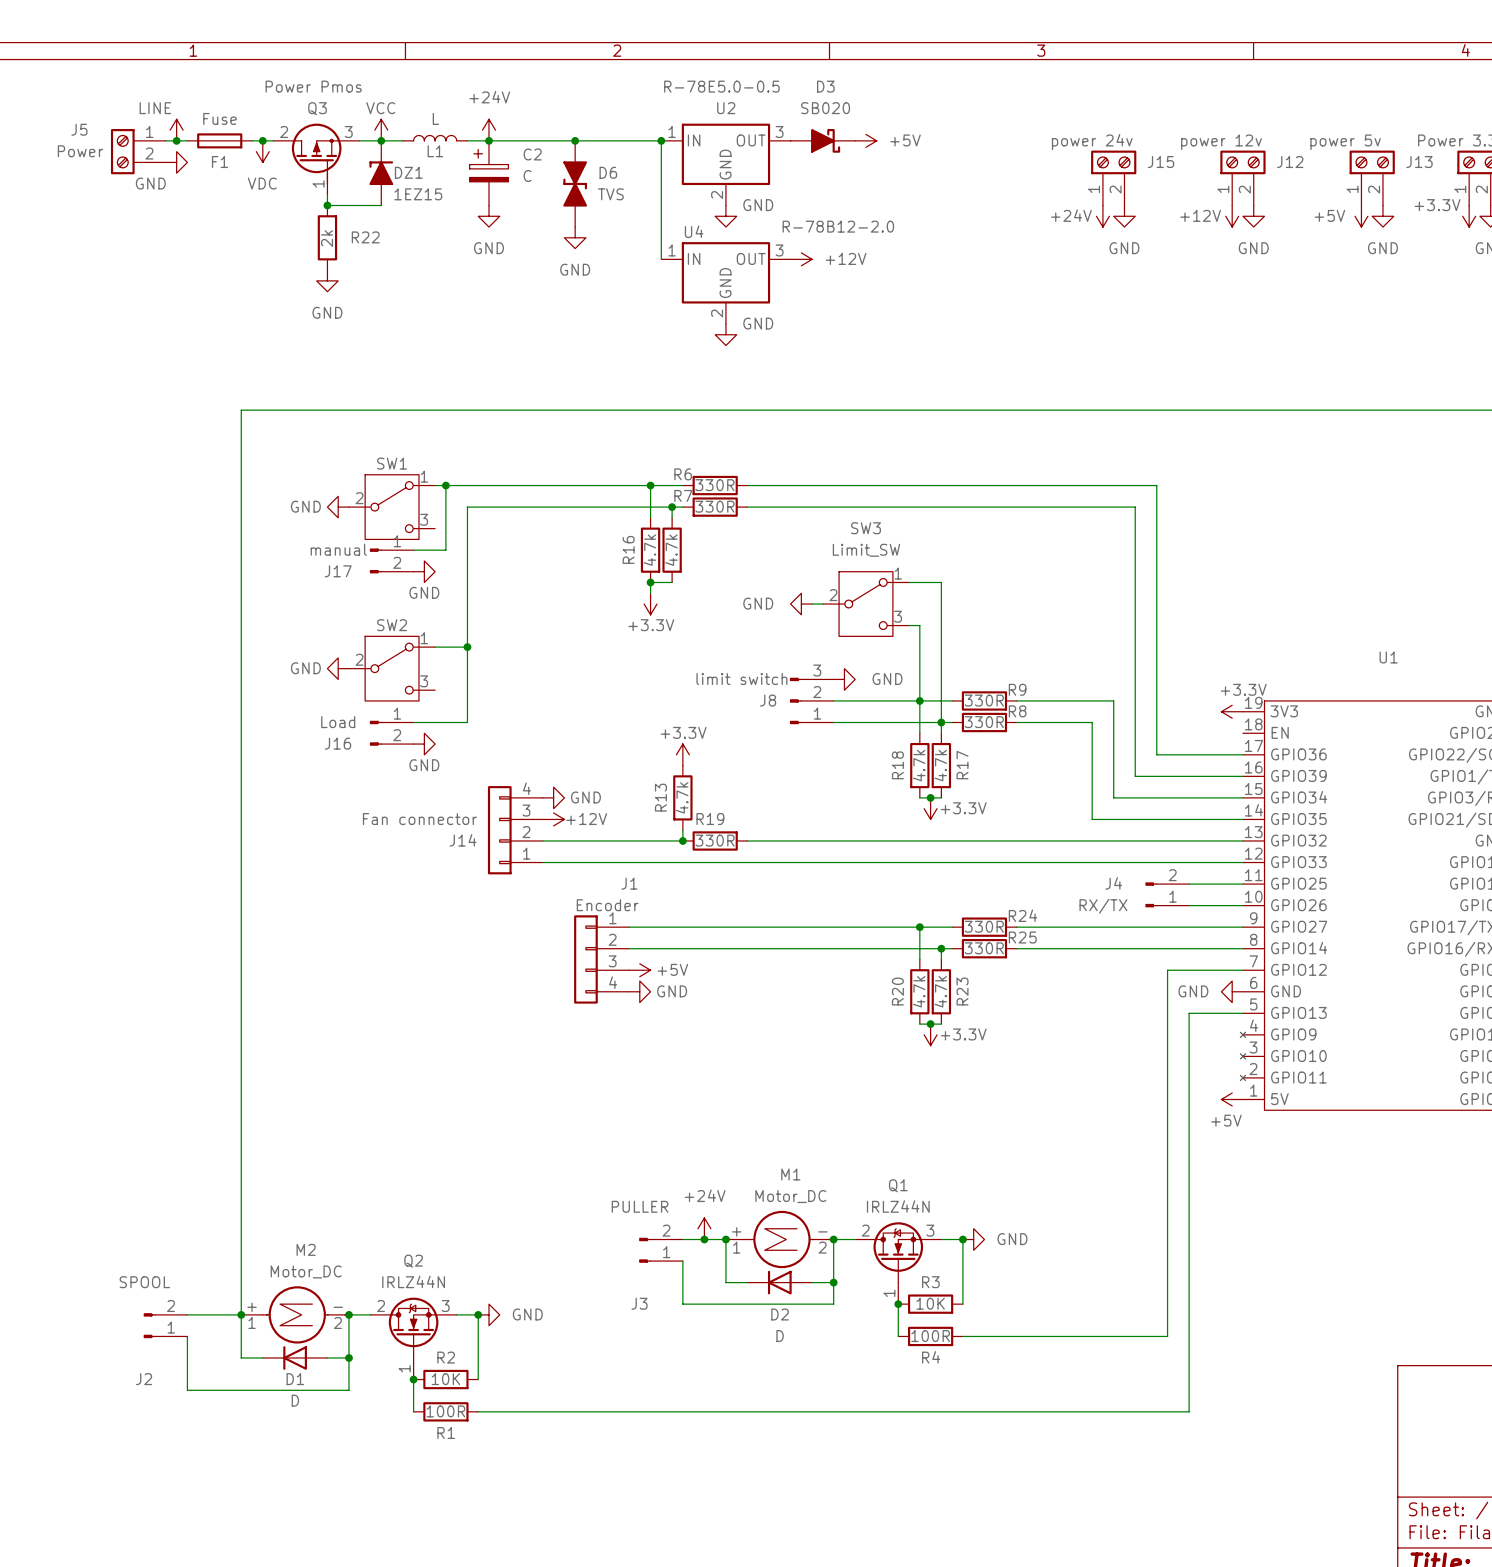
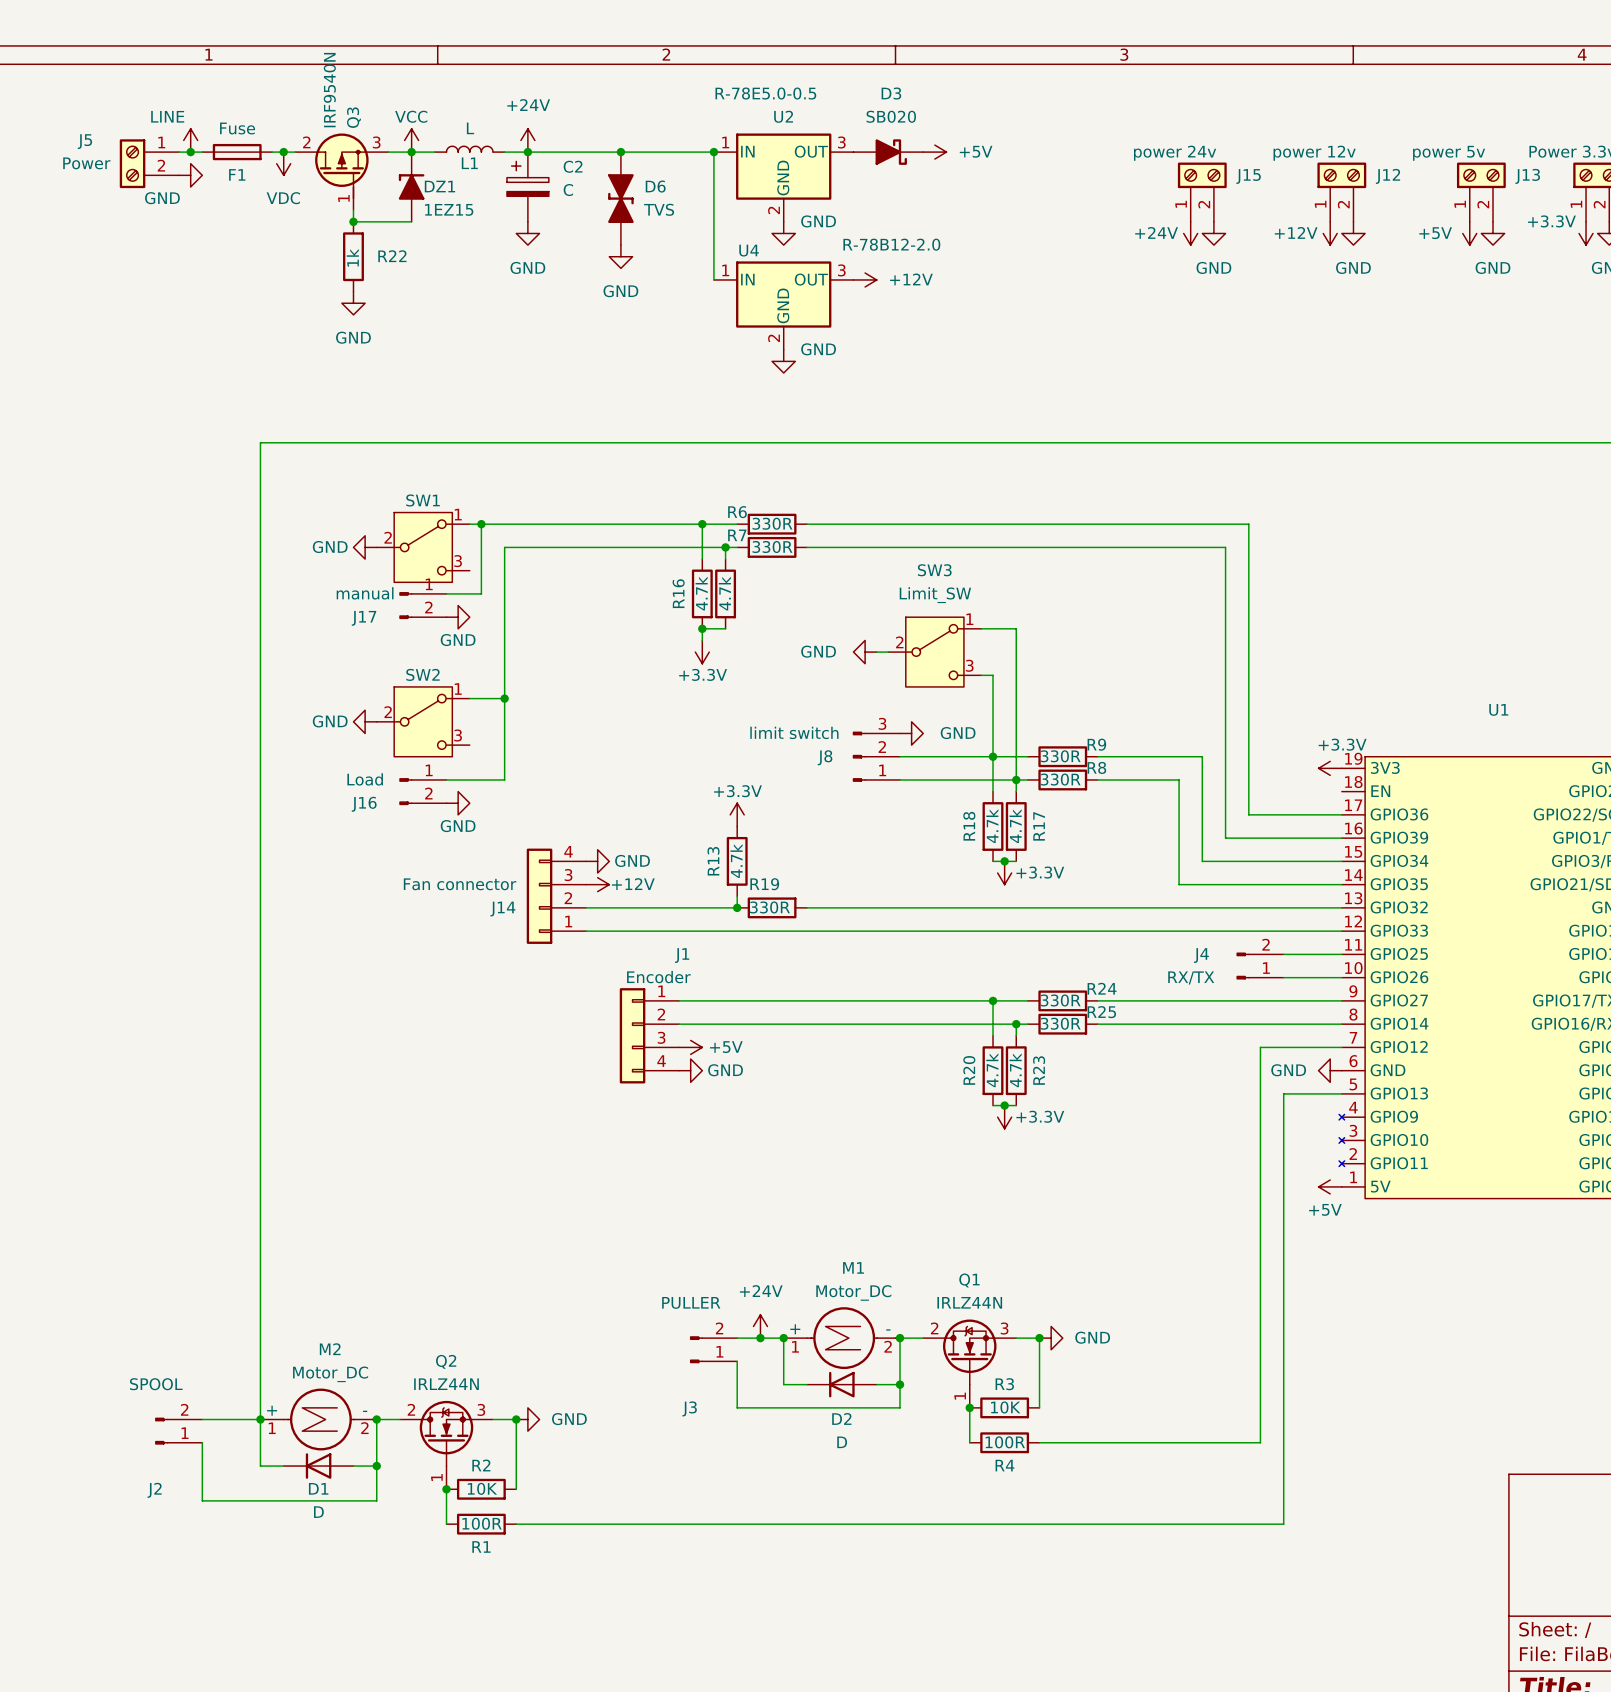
Q3 value: Power Pmos (313, 86) -> IRF9540N (329, 90)
Q3 name rotation: 0° (317, 108) -> 90° counterclockwise (353, 117)
R22 value: 2k (327, 238) -> 1k (352, 257)

